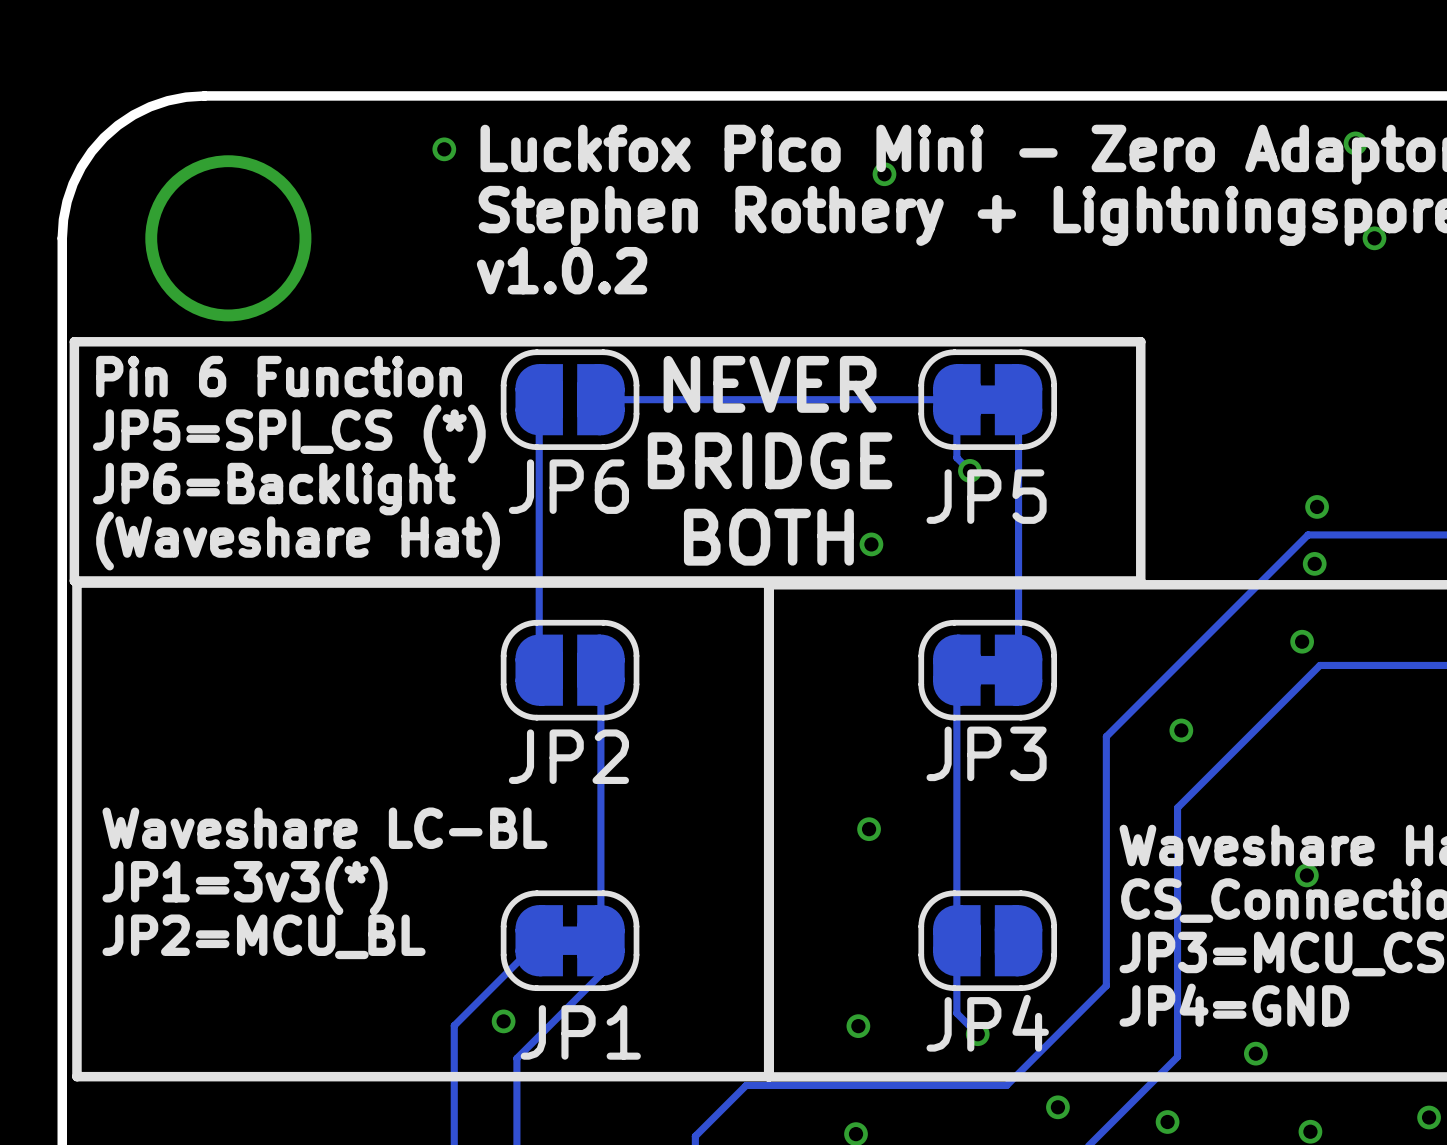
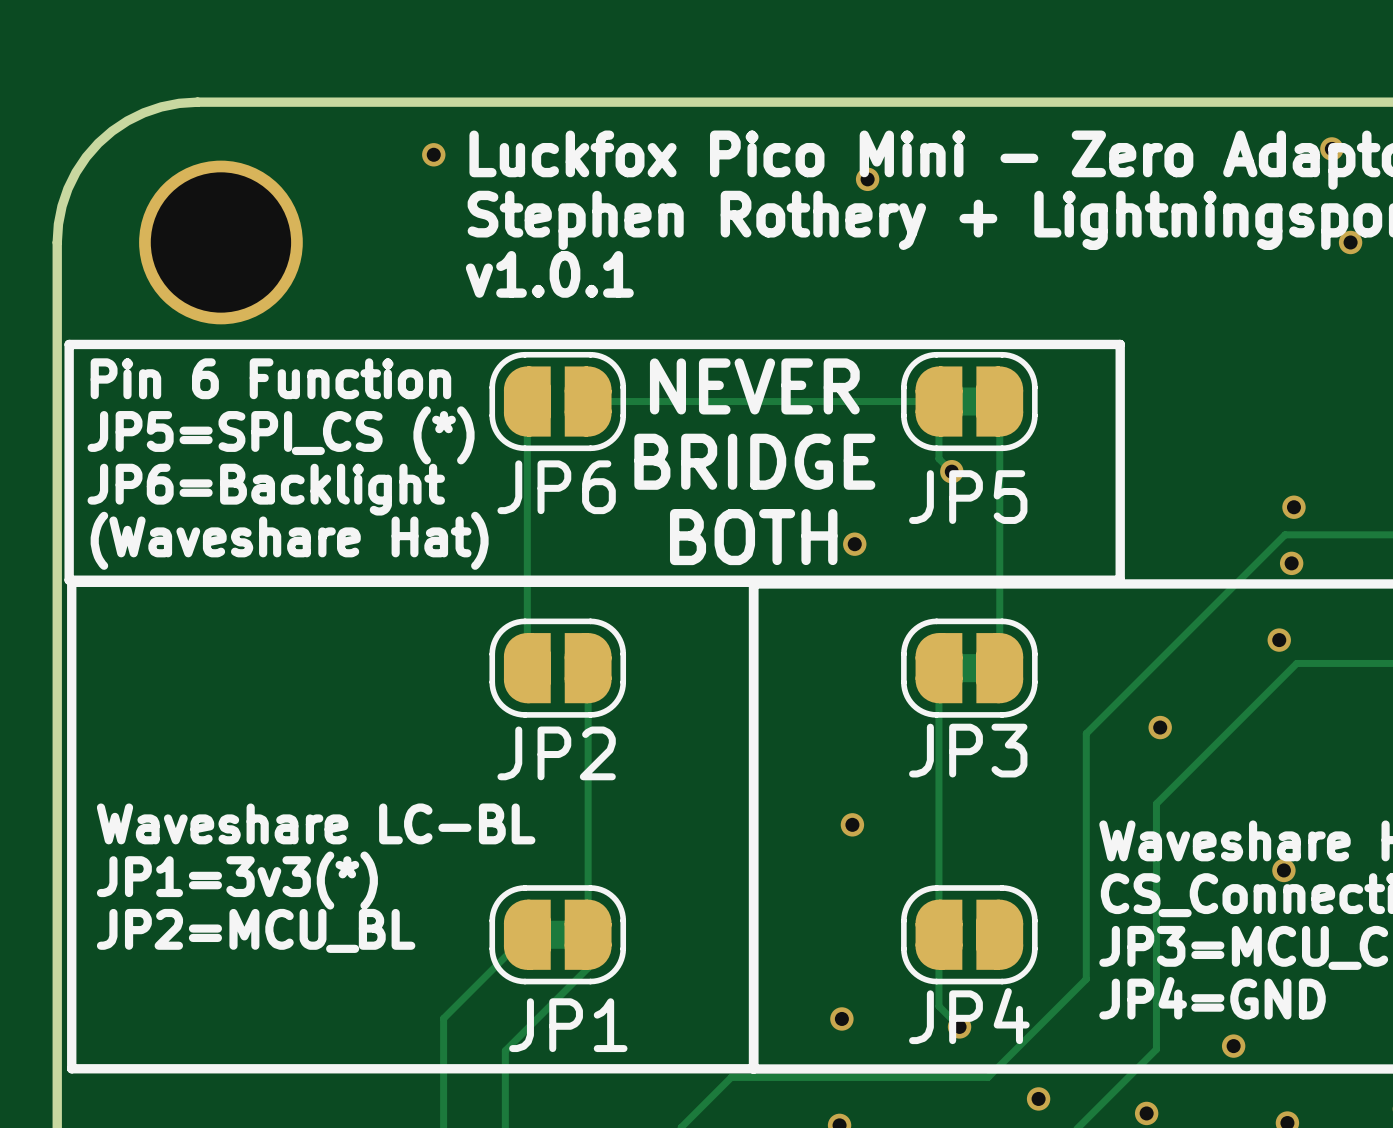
text: v1.0.2 (562, 270) -> v1.0.1 (549, 274)
via: (503, 1021) -> none

